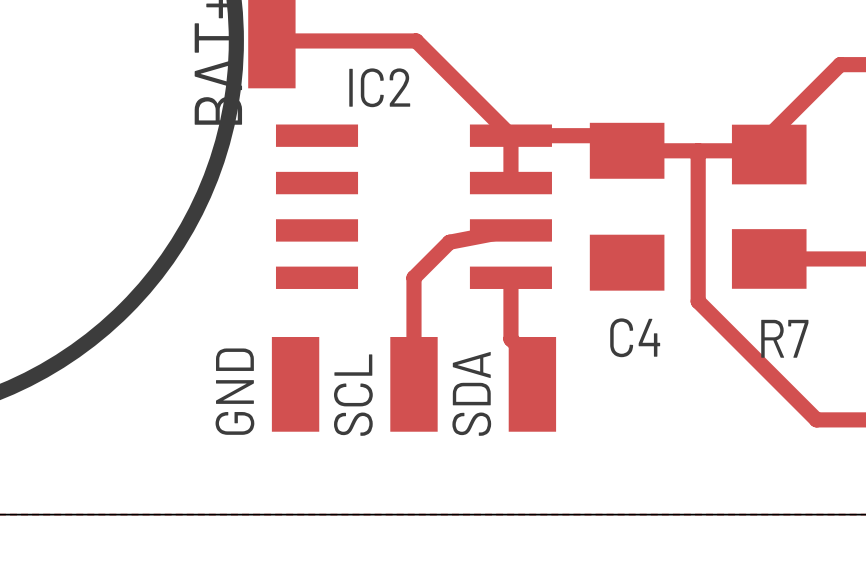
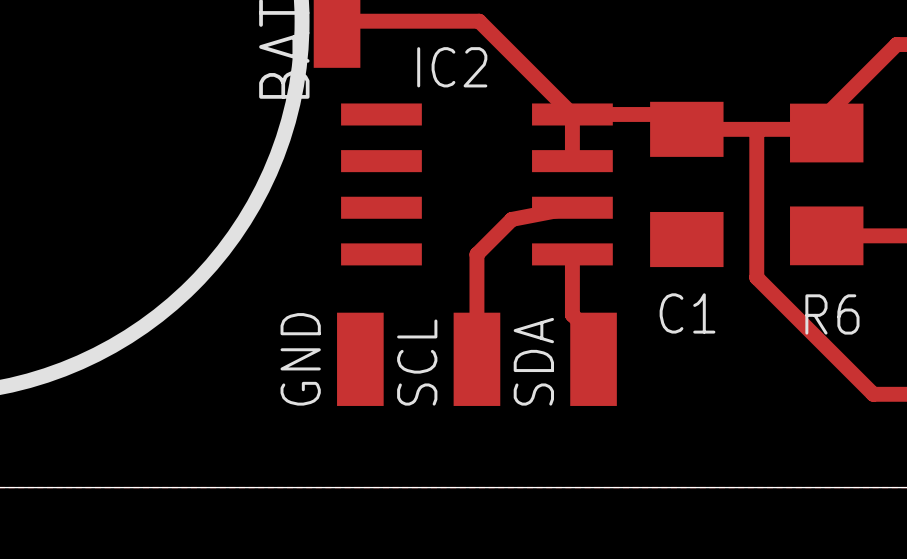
C4 name: C4 (635, 337) -> C1 (687, 313)
R7 name: R7 (784, 338) -> R6 (832, 314)

